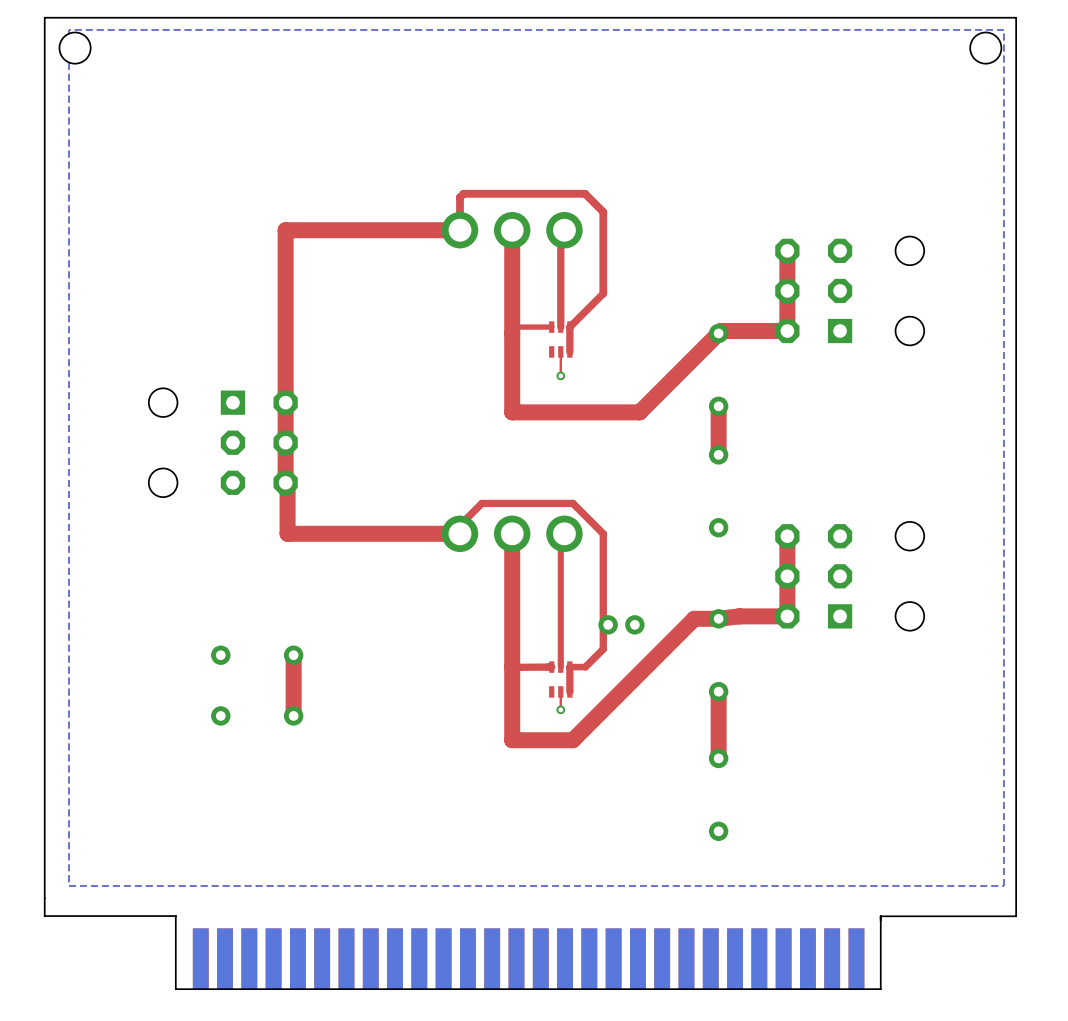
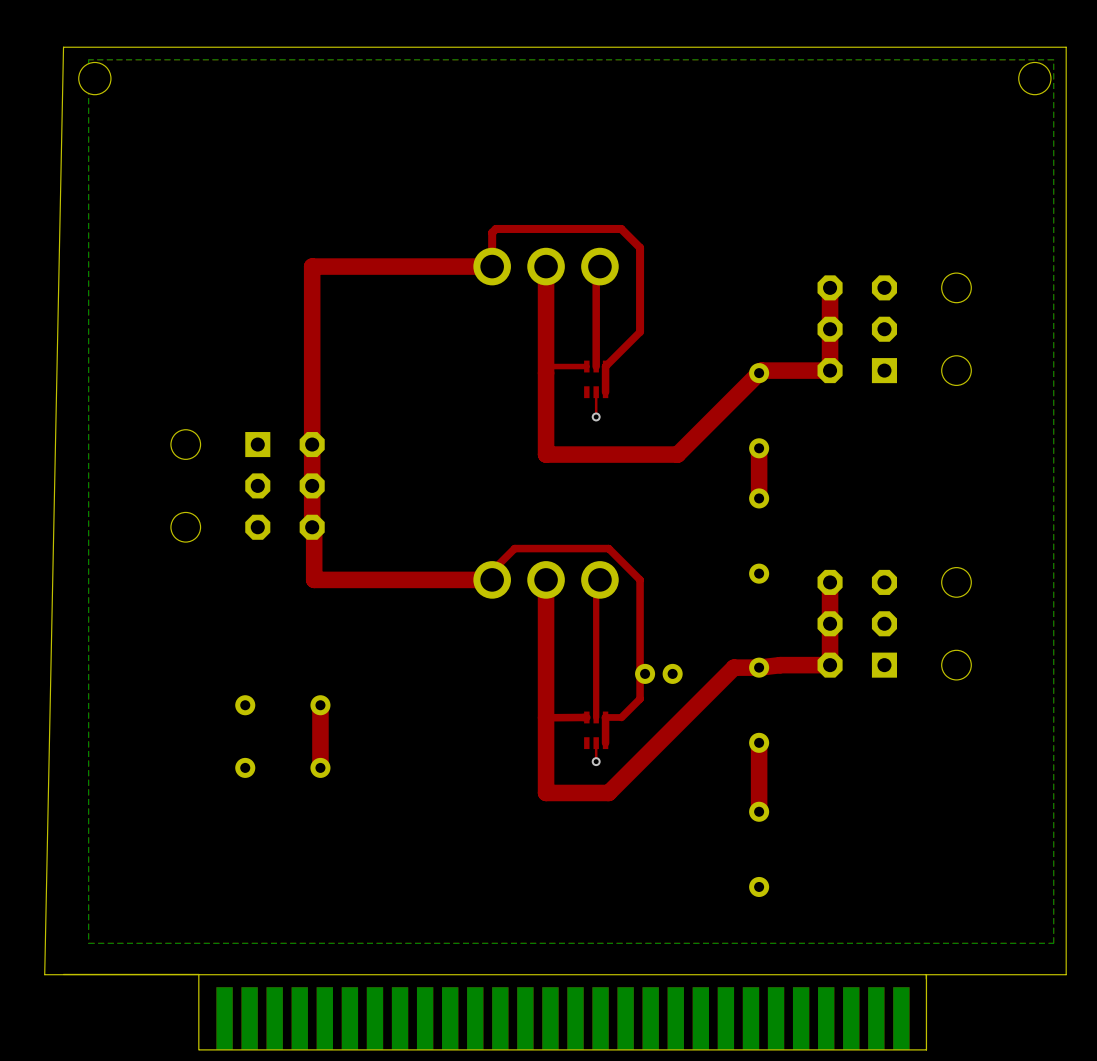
board edge: (44, 17) (44, 916) -> (63, 47) (44, 974) (926, 974)

